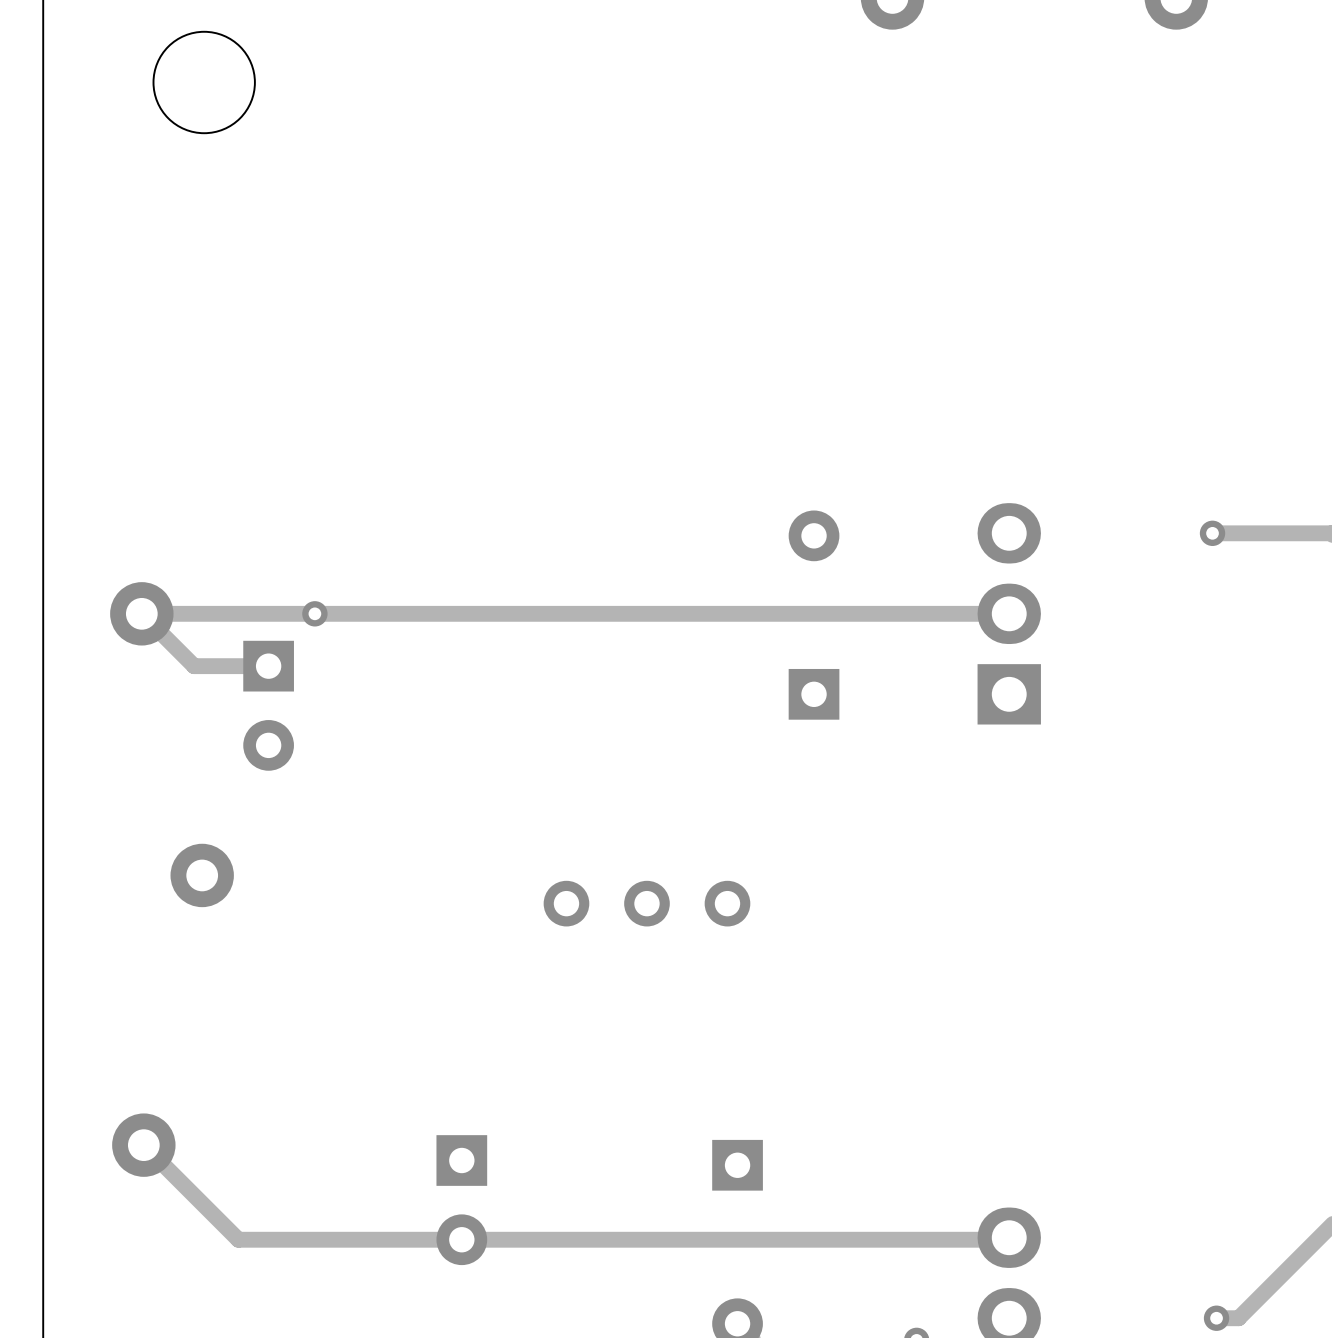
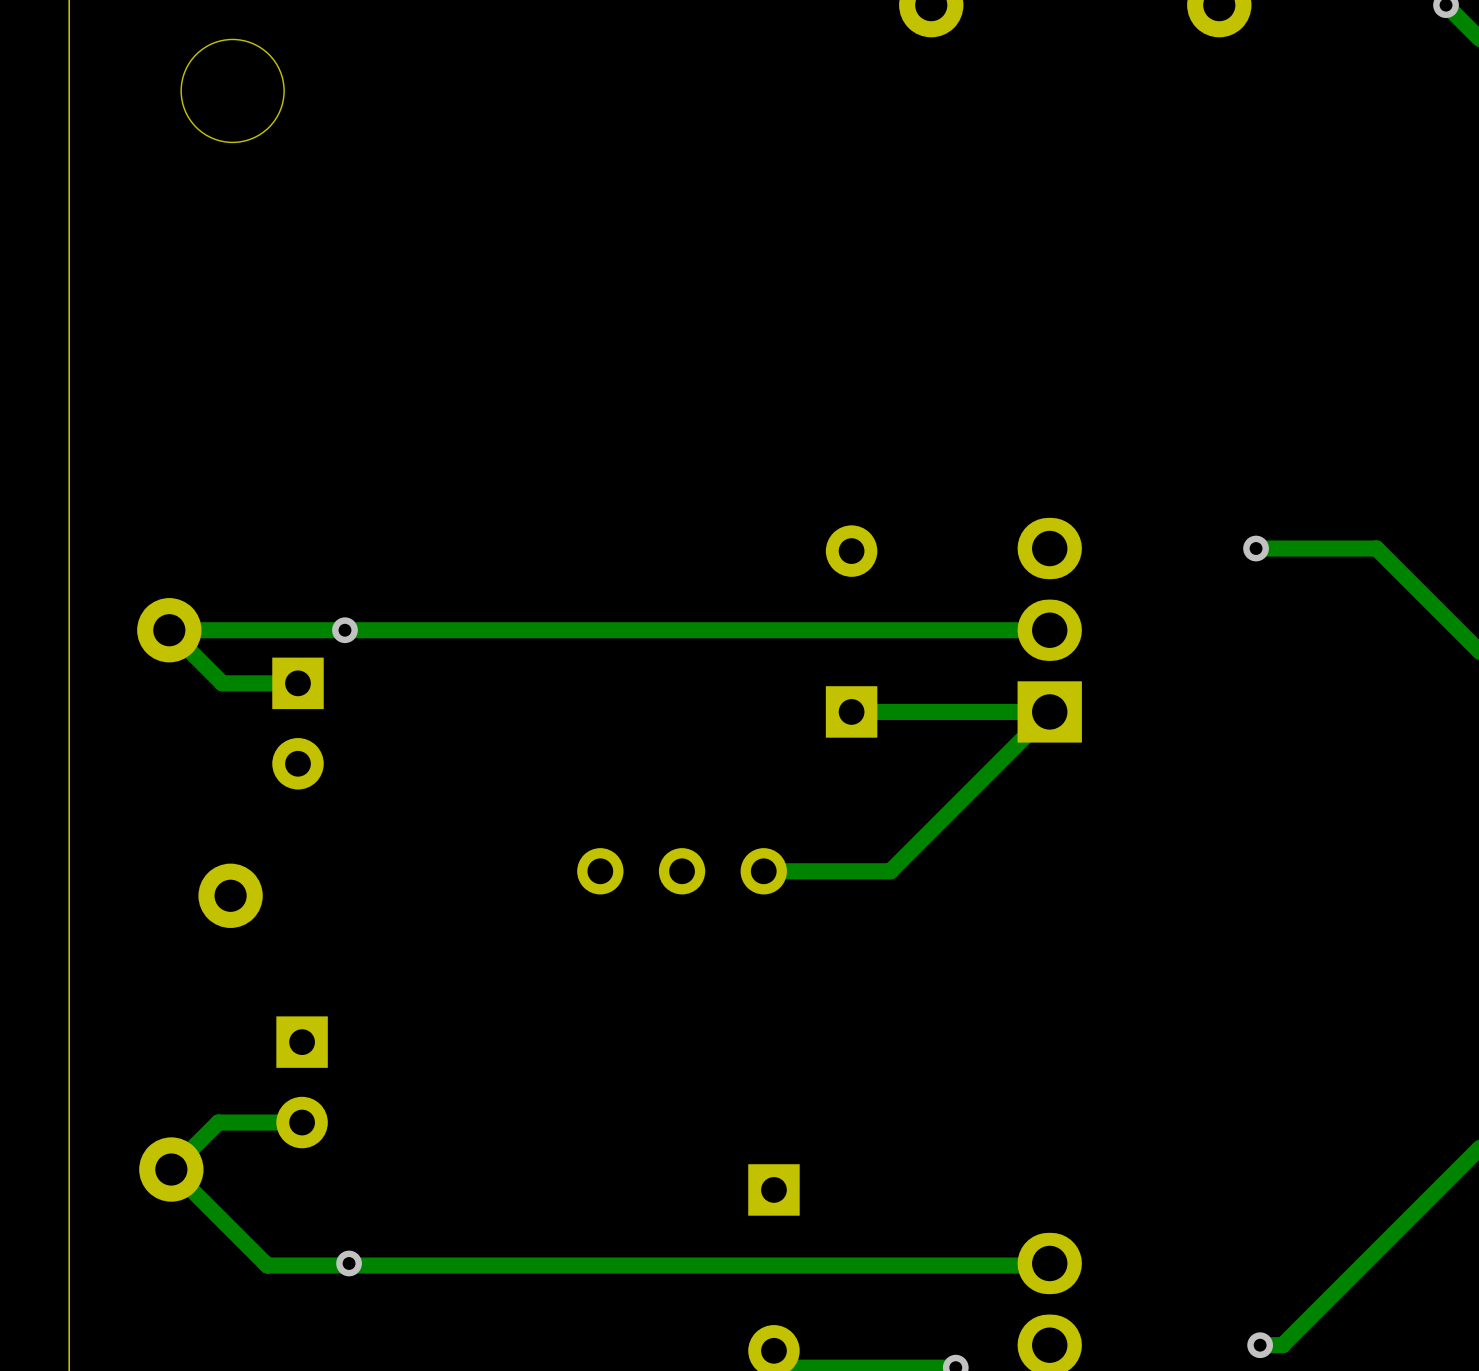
track: none -> (851, 711) (1049, 711) (890, 871) (763, 871)
part position: (646, 903) -> (682, 871)
track: none -> (302, 1122) (218, 1122) (172, 1168)
part position: (461, 1200) -> (302, 1082)
via: none -> (349, 1263)

